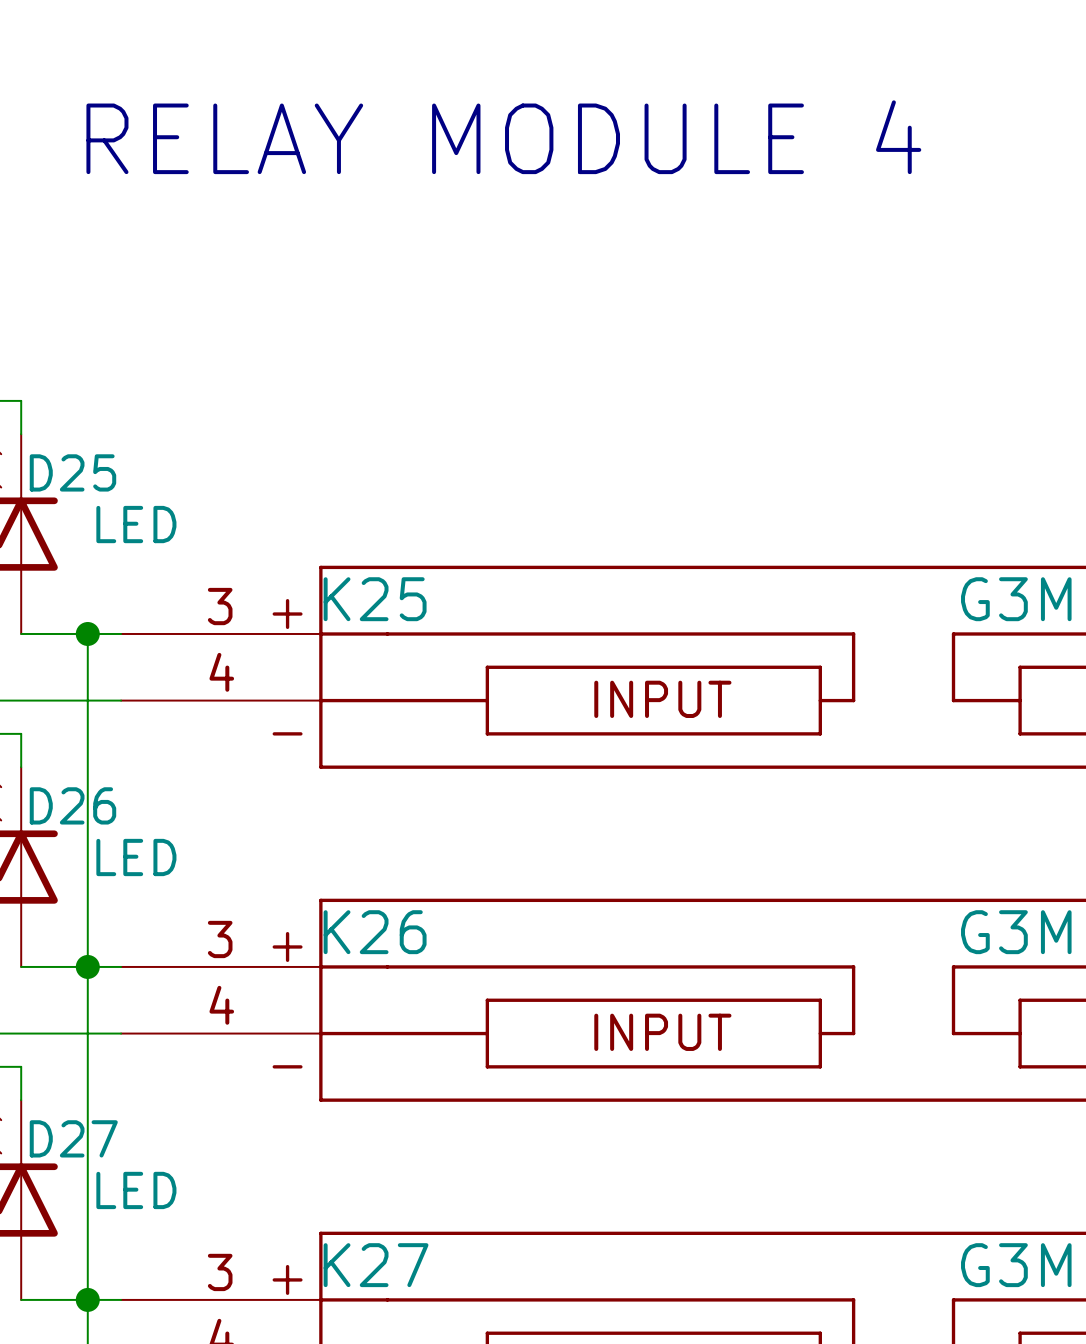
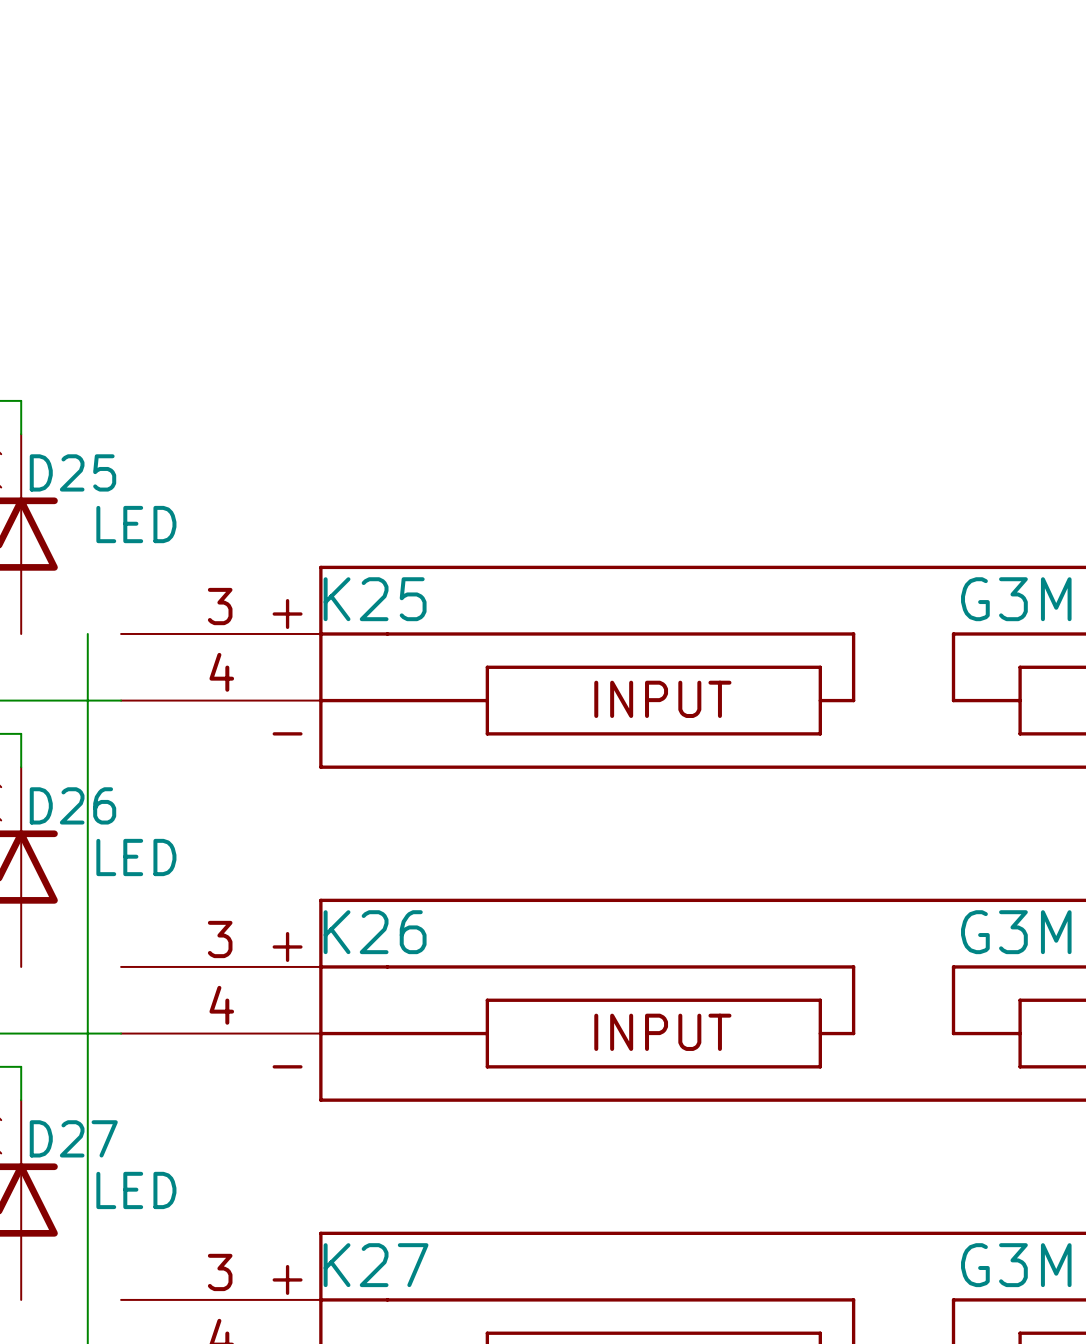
text: RELAY MODULE 4 (503, 137) -> none
wire: (21, 633) (121, 633) -> none
junction: (87, 633) -> none
wire: (21, 966) (121, 966) -> none
junction: (87, 966) -> none
wire: (21, 1299) (121, 1299) -> none
junction: (87, 1299) -> none

